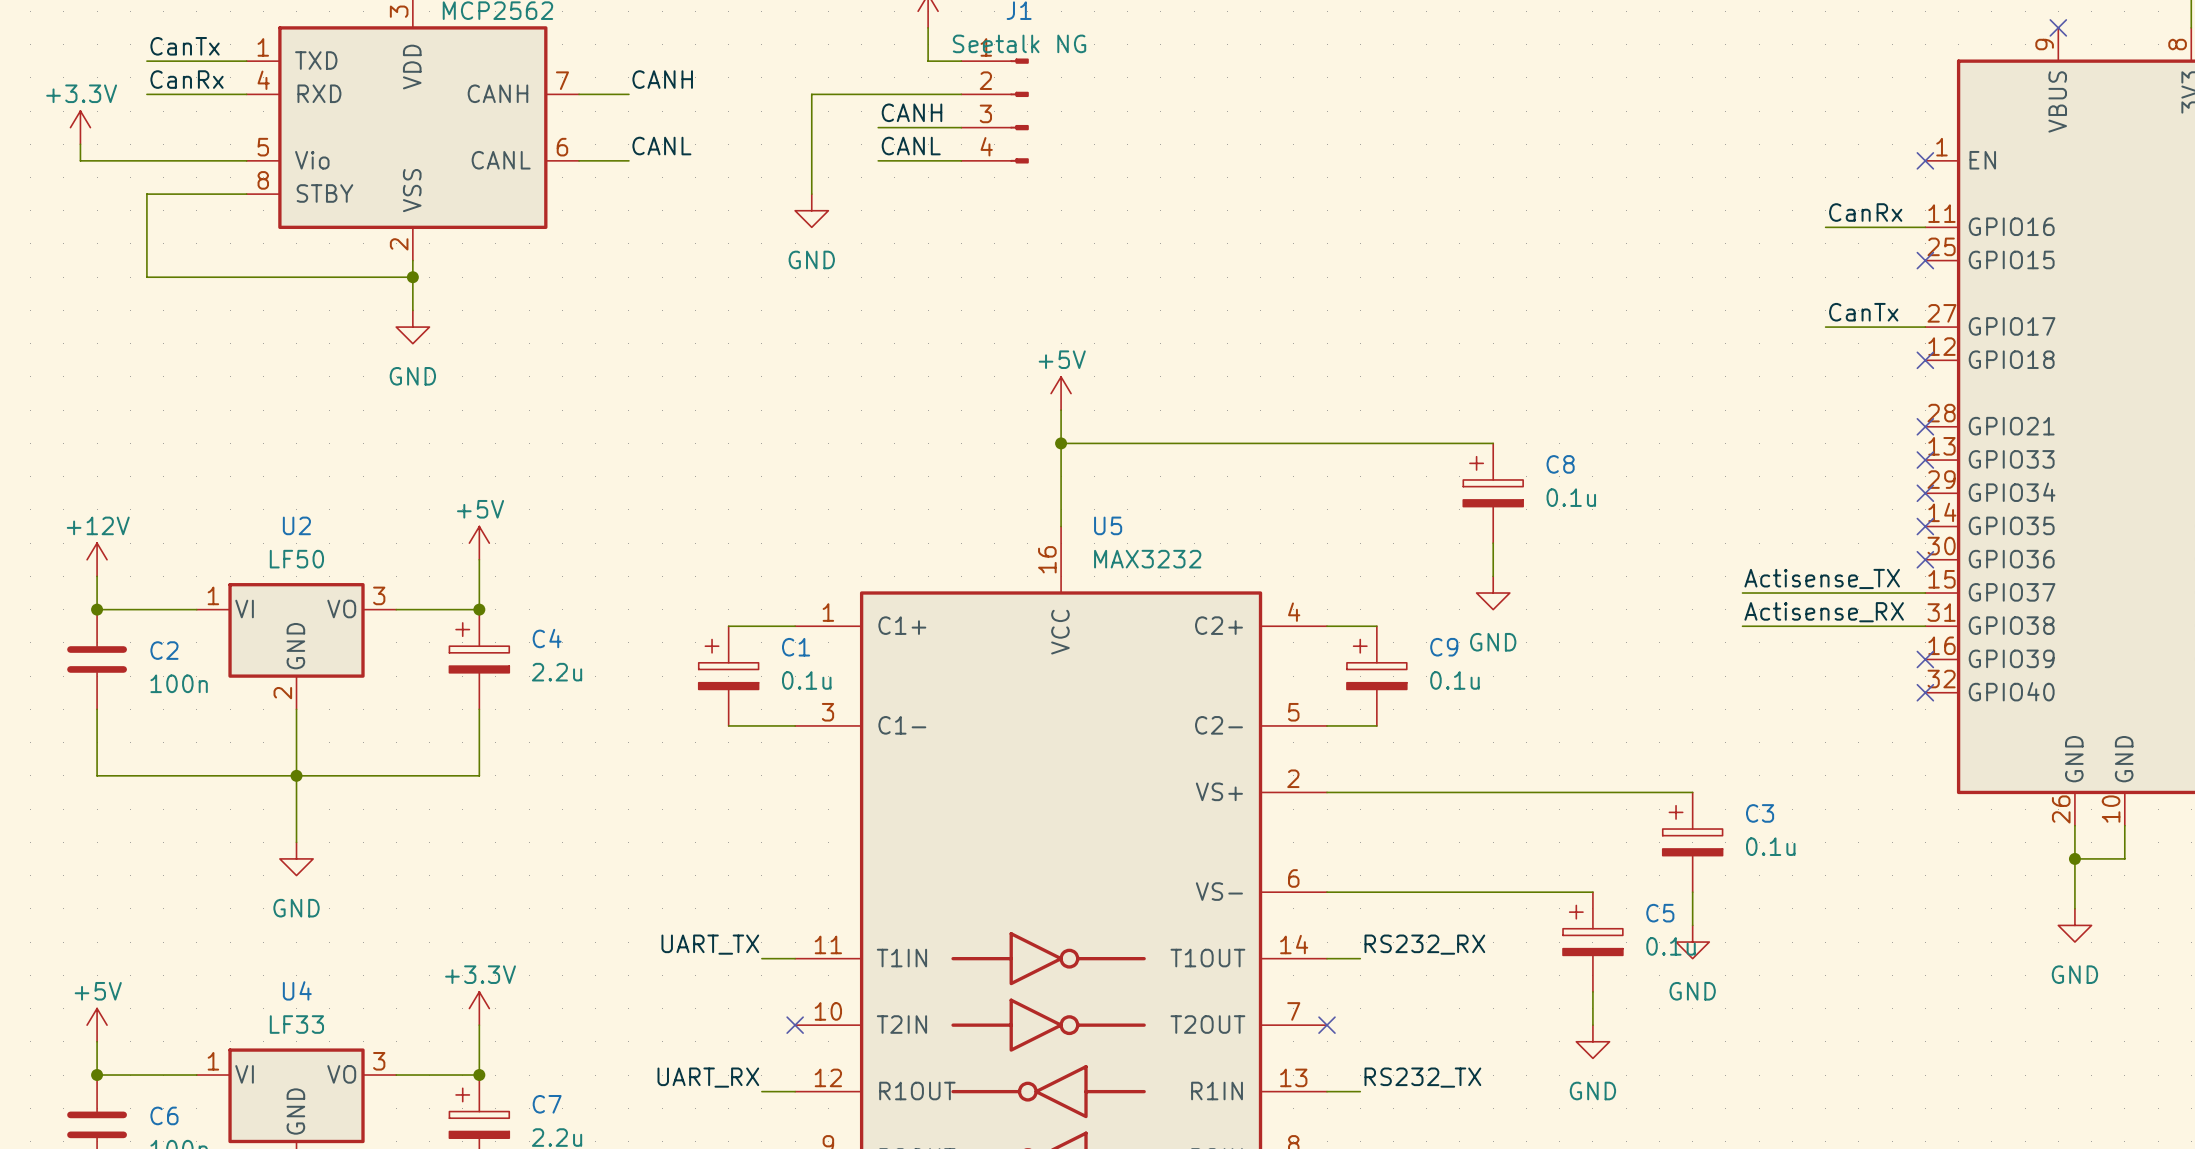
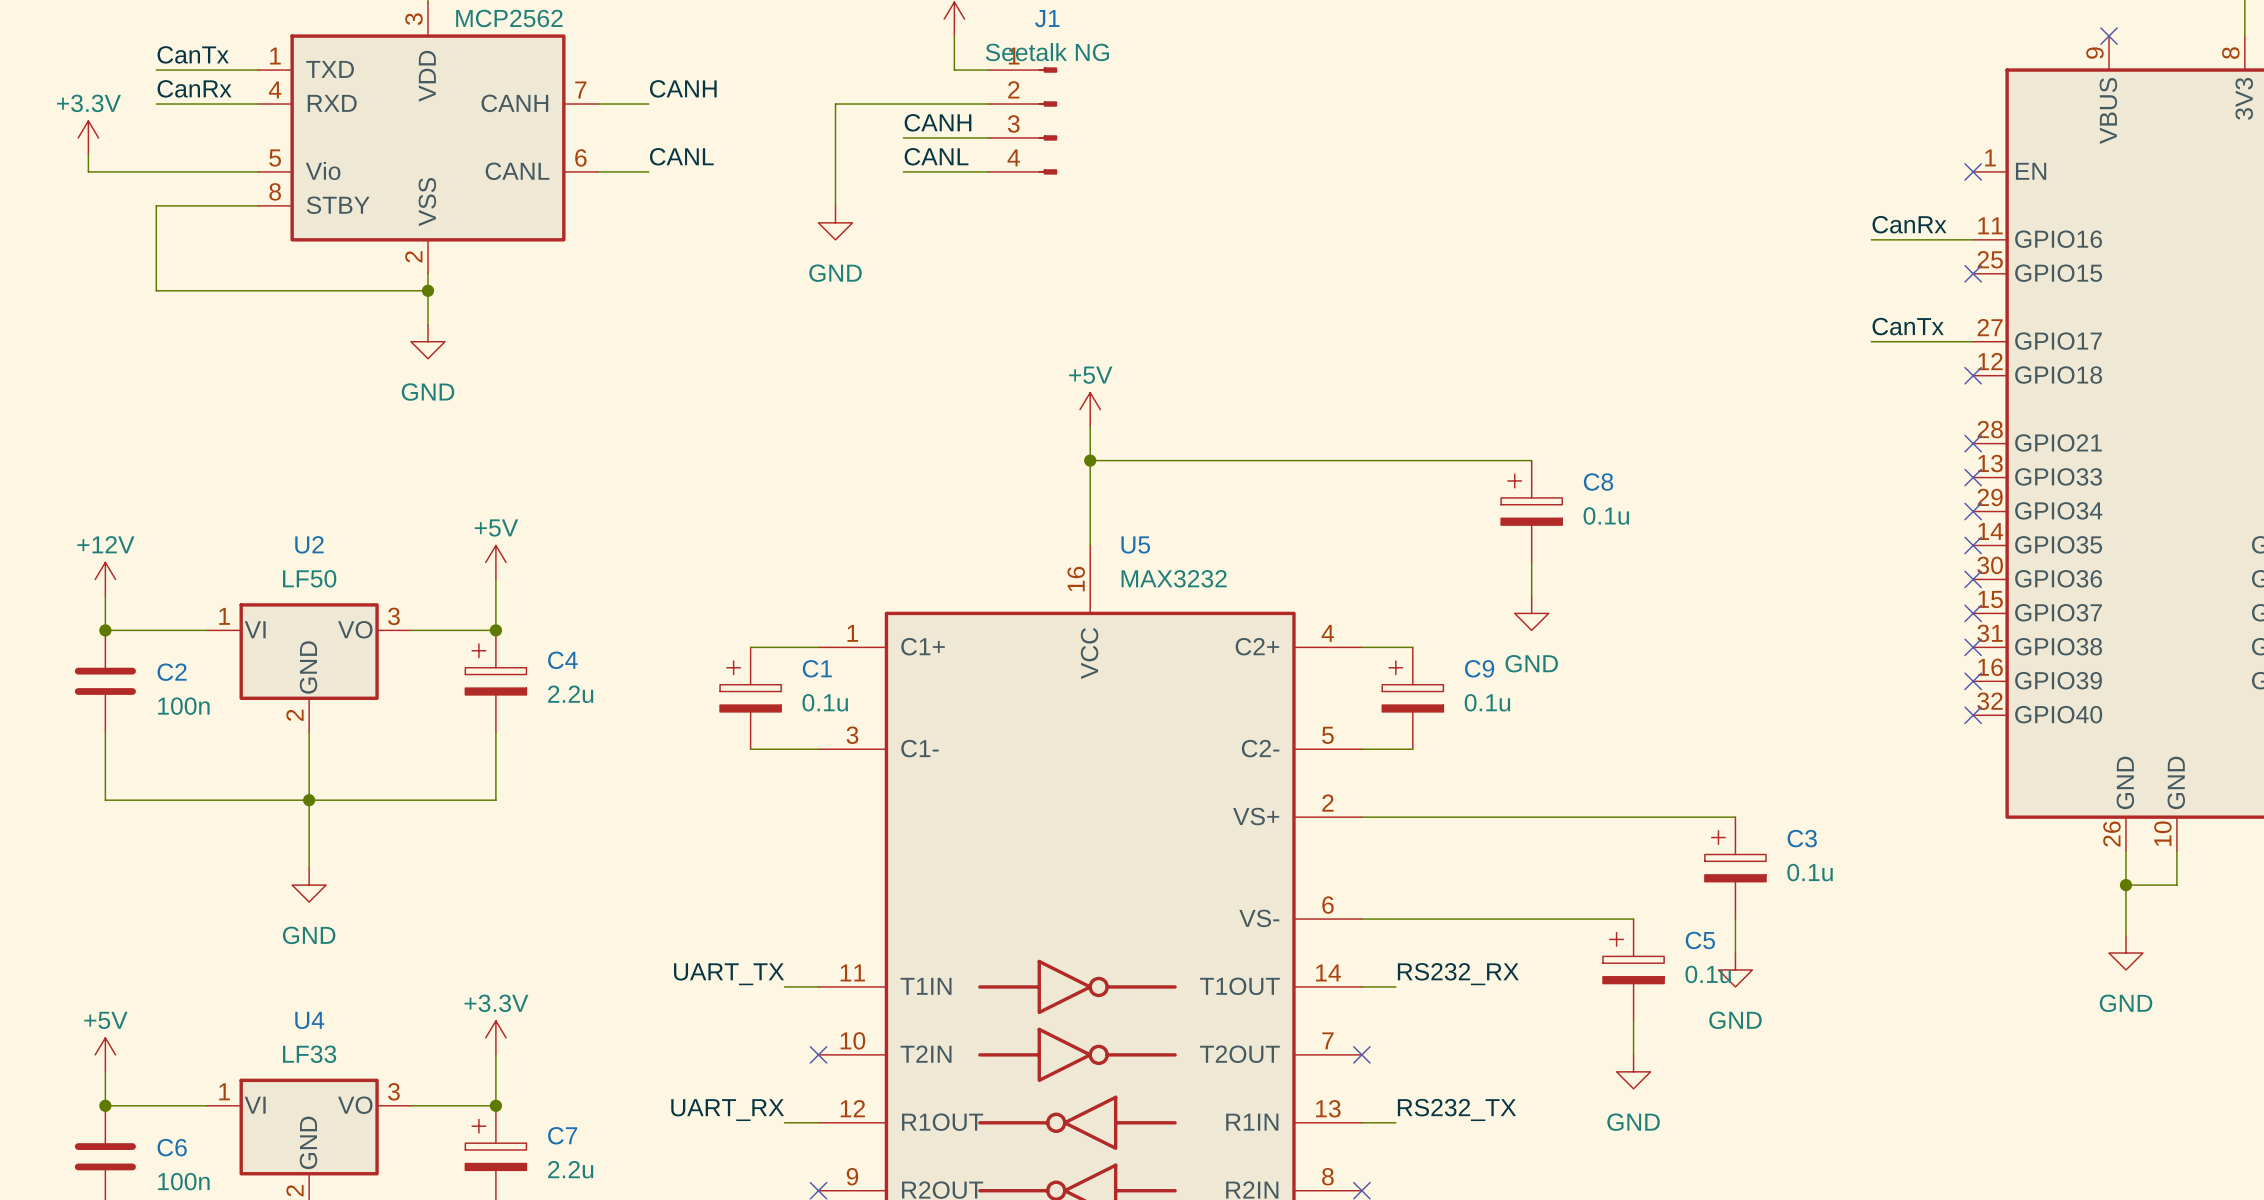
label: Actisense_TX (1822, 578) -> none
wire: (1742, 593) (1925, 593) -> none
no-connect mark: none -> (1973, 613)
label: Actisense_RX (1824, 612) -> none
wire: (1742, 626) (1925, 626) -> none
no-connect mark: none -> (1973, 647)

